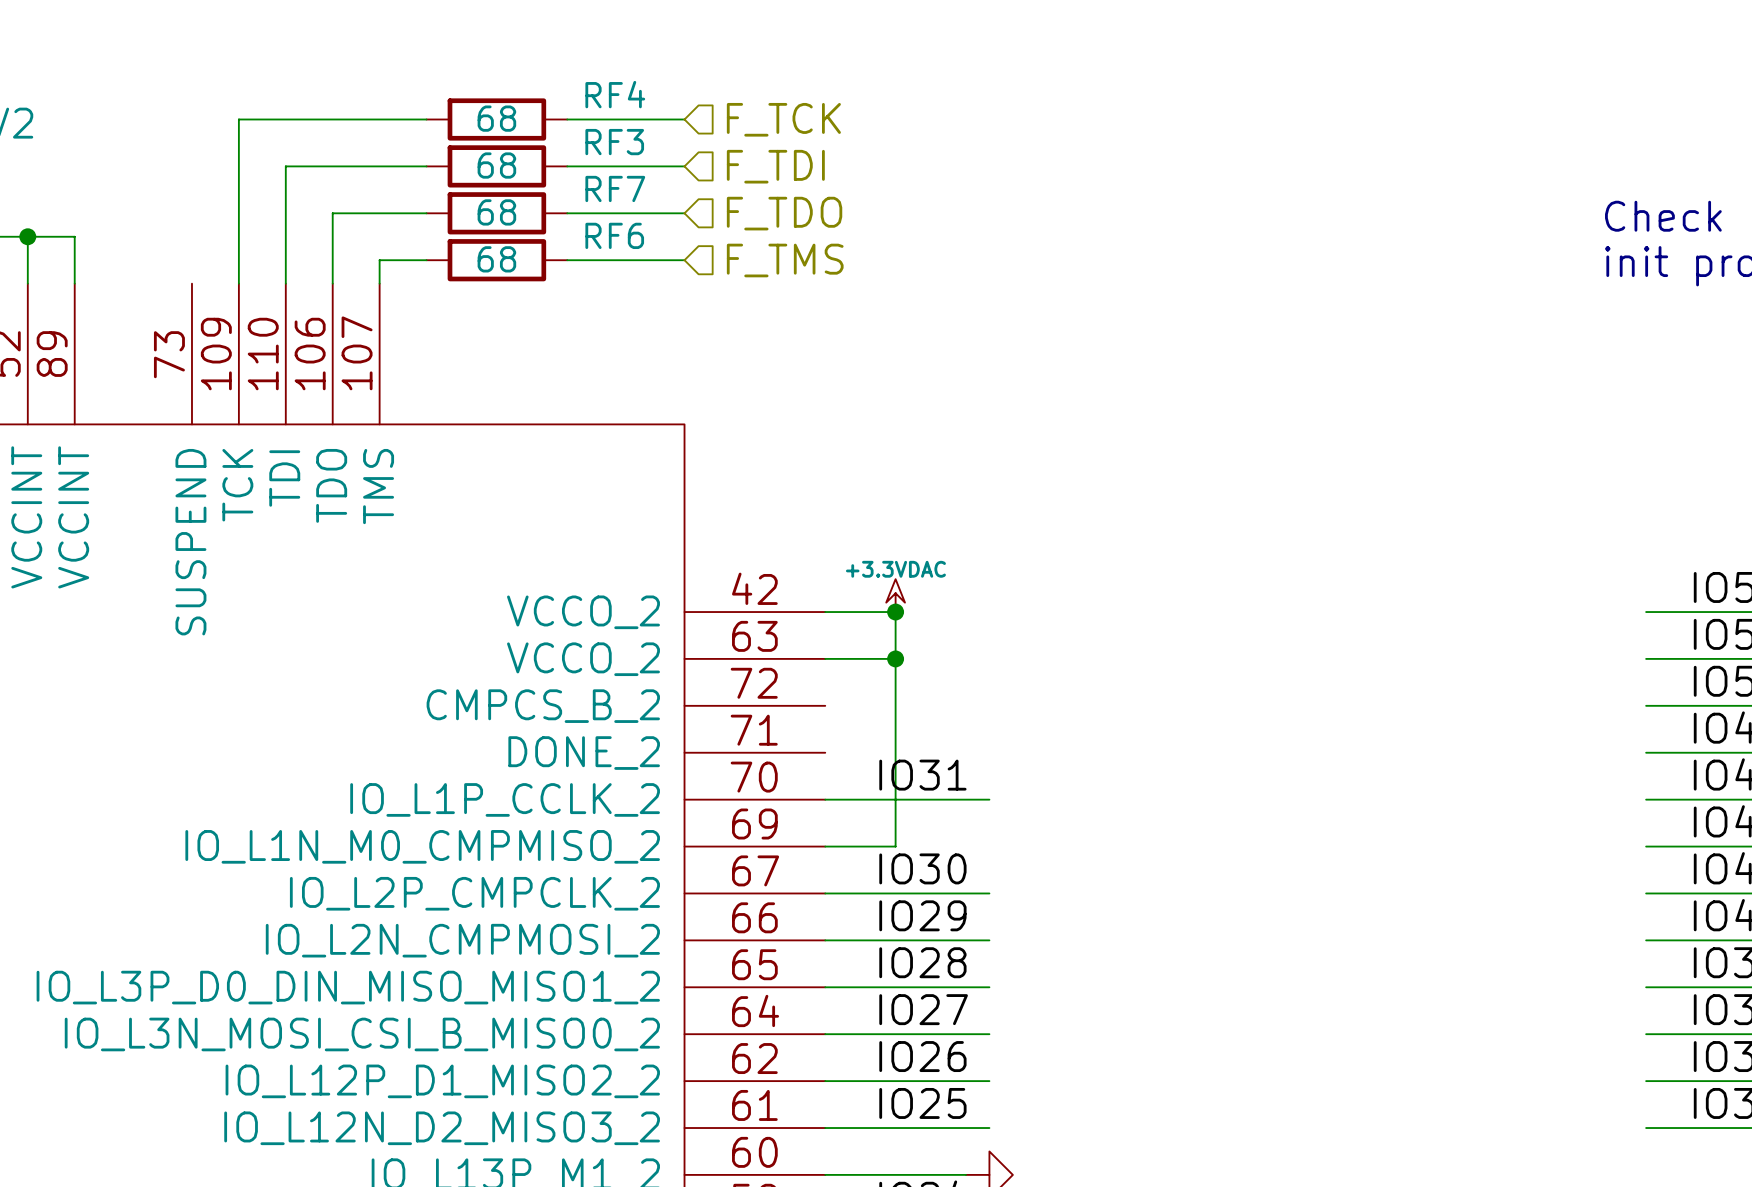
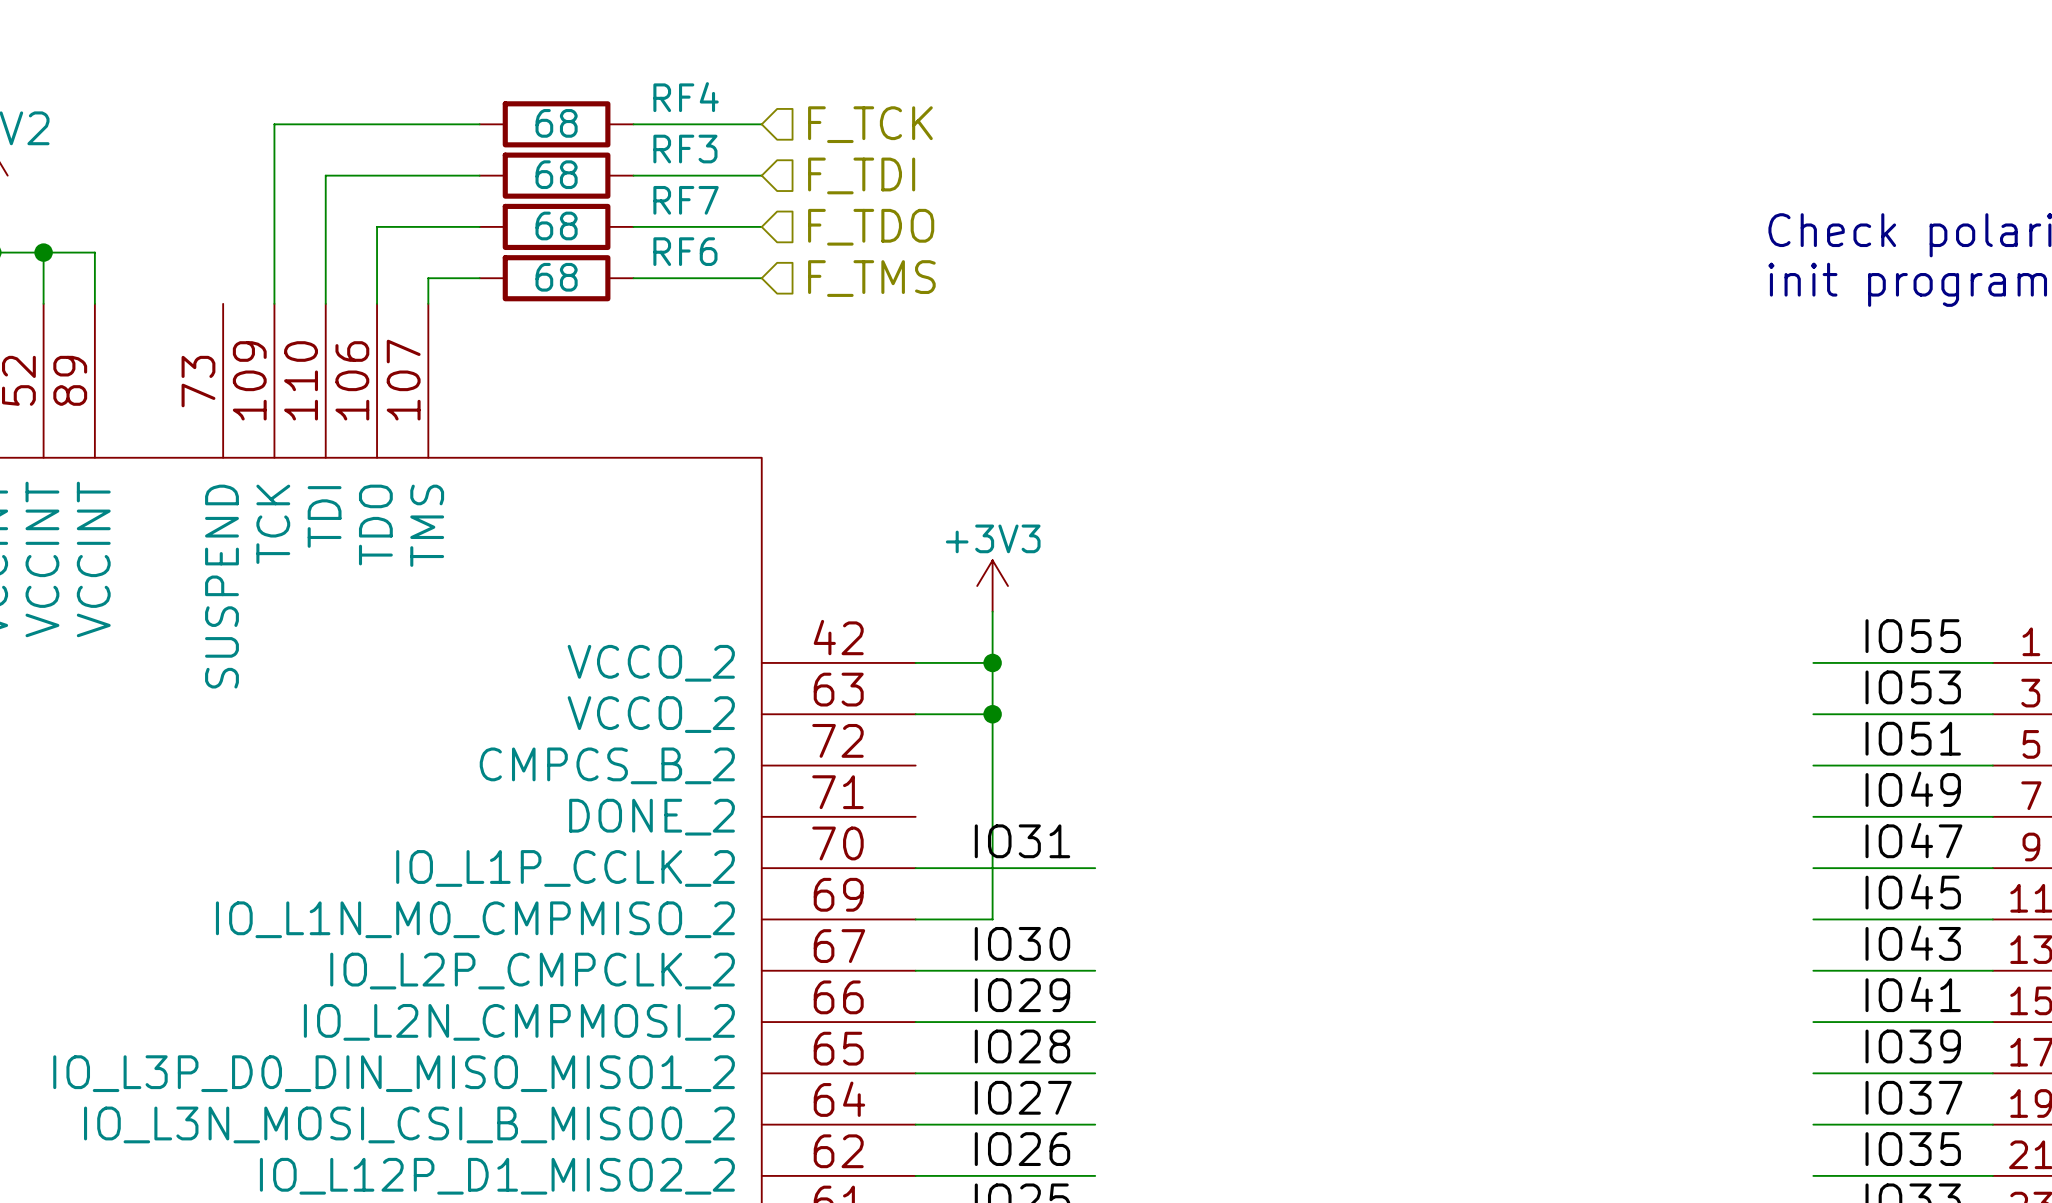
power symbol: none -> +3V3 (992, 586)
power symbol: +3.3VDAC (895, 595) -> none

